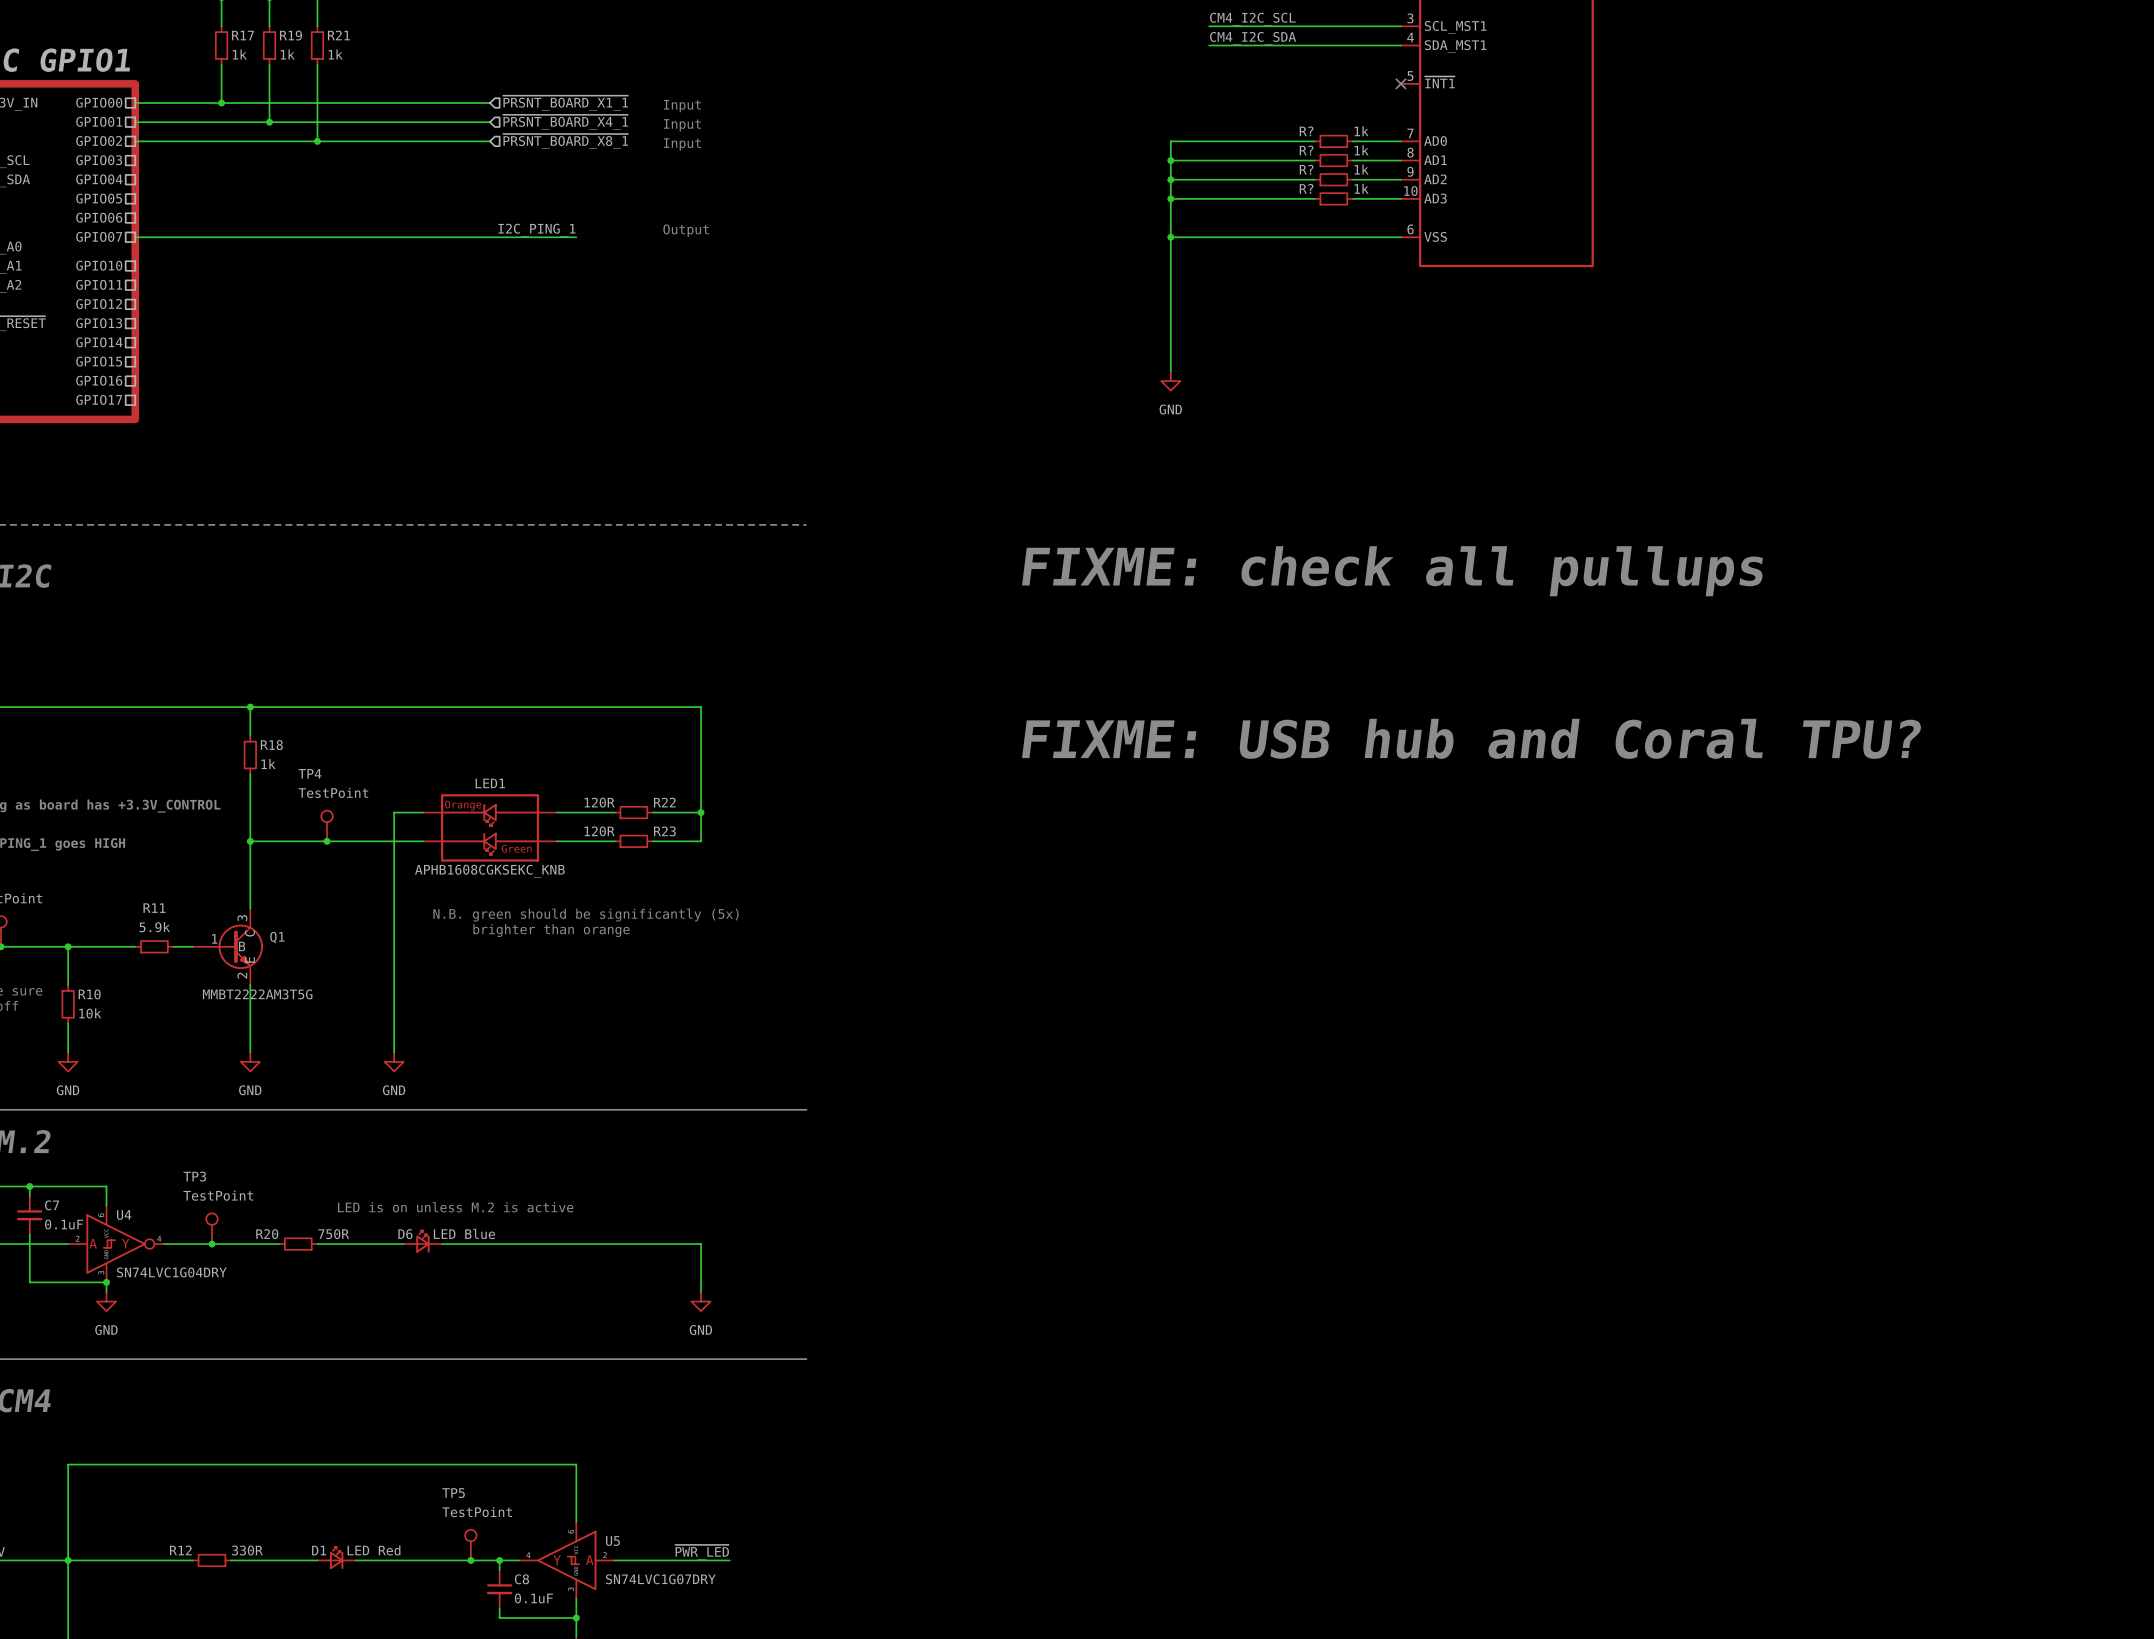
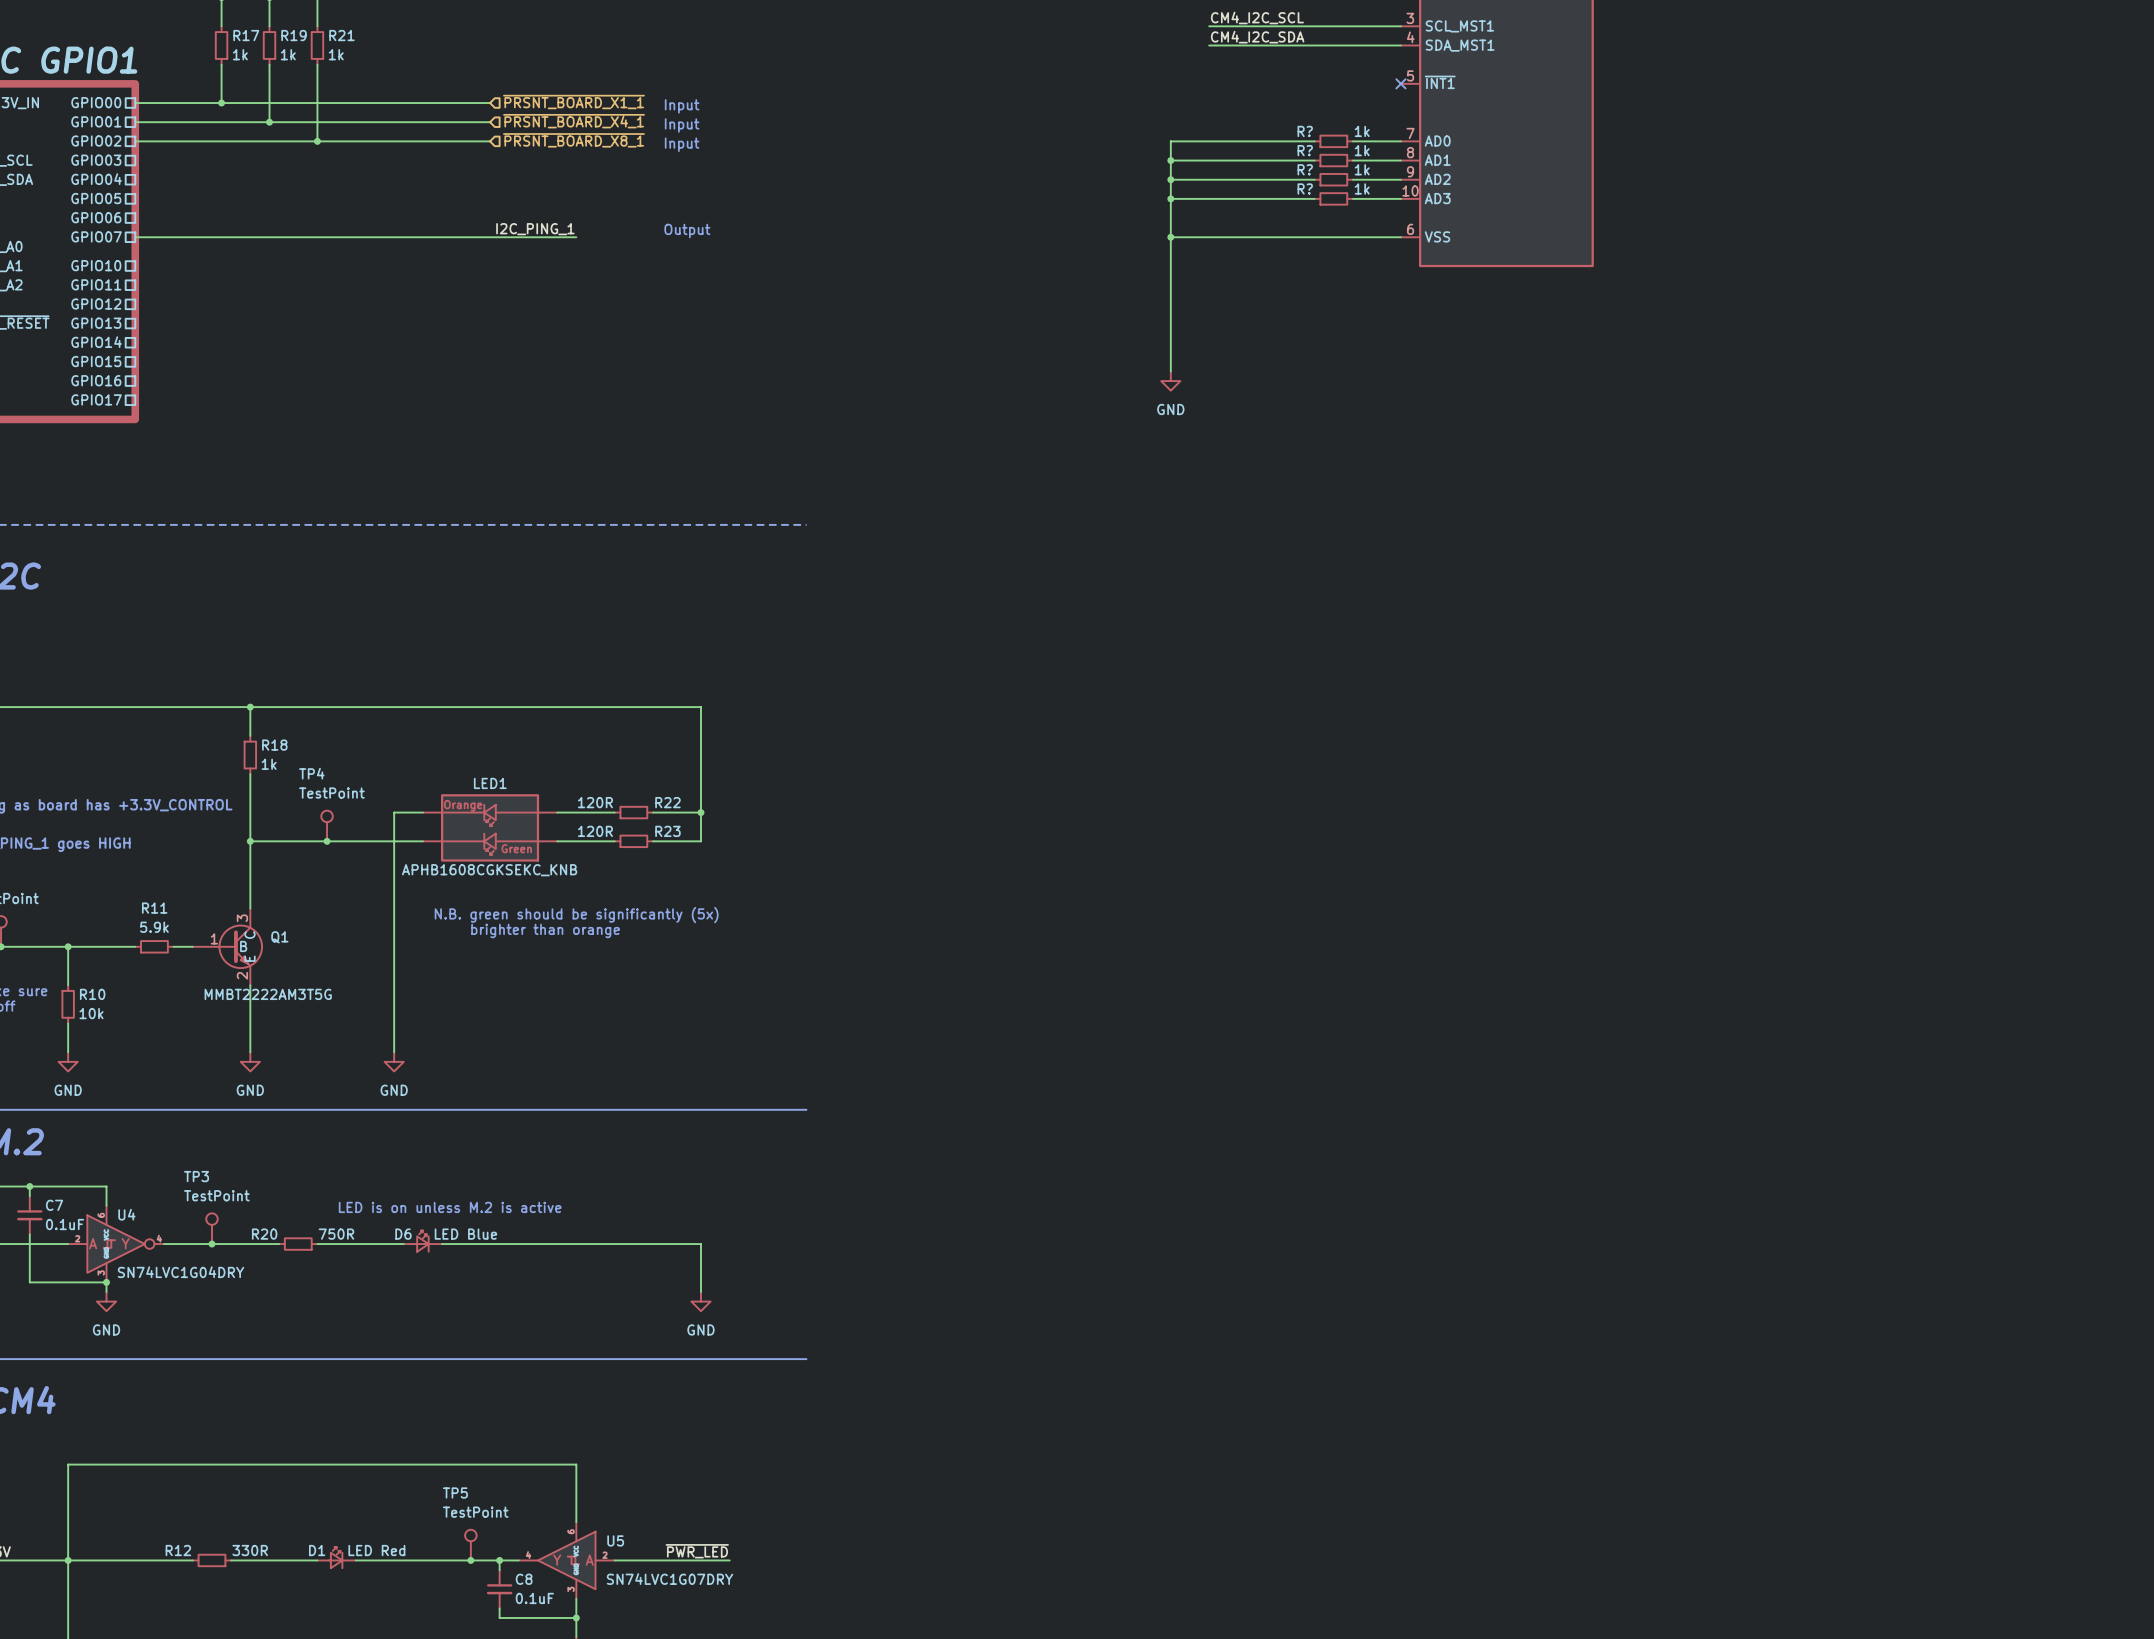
text: FIXME: check all pullups (1392, 571) -> none
text: FIXME: USB hub and Coral TPU? (1471, 738) -> none

